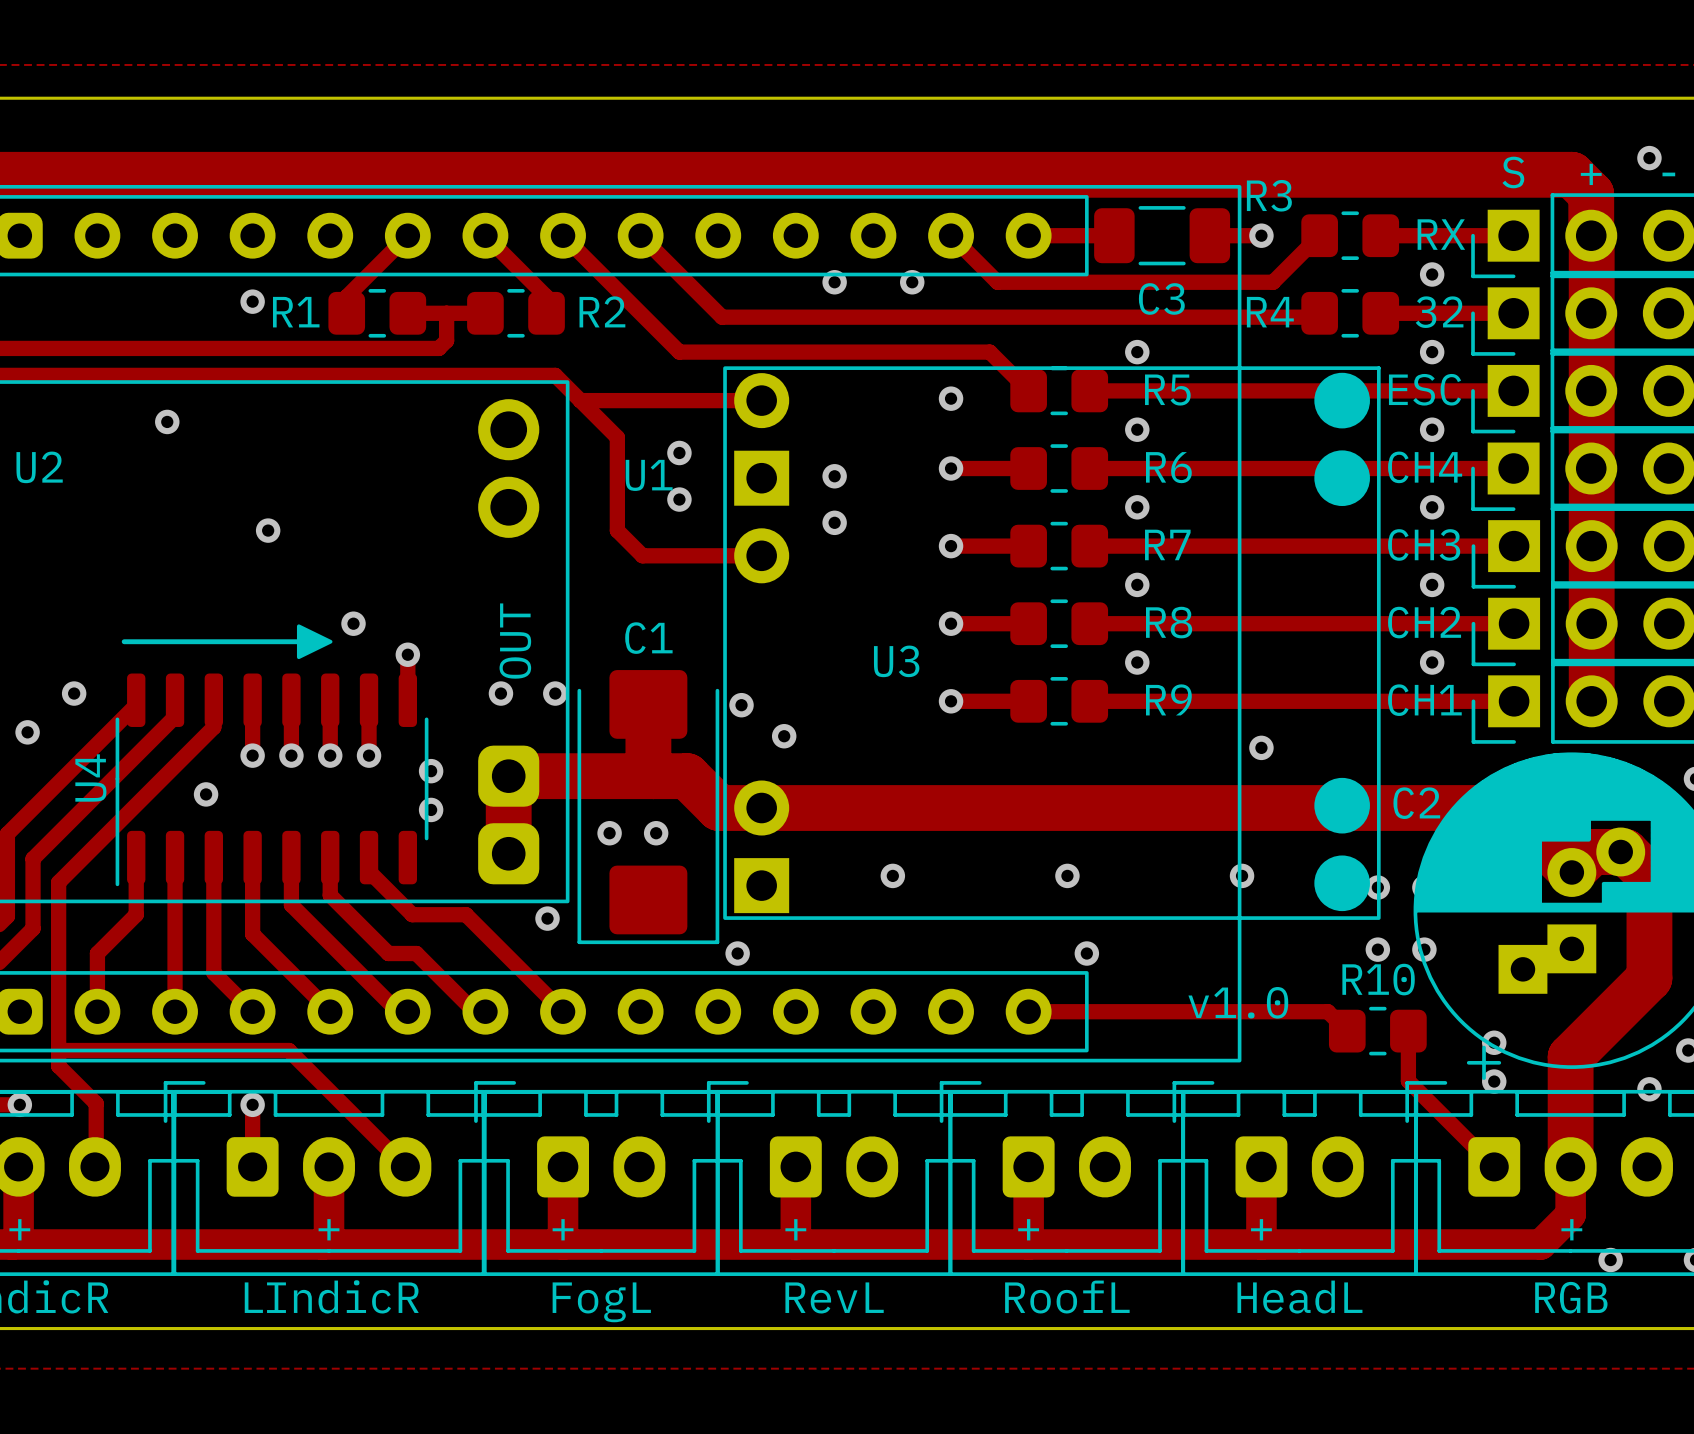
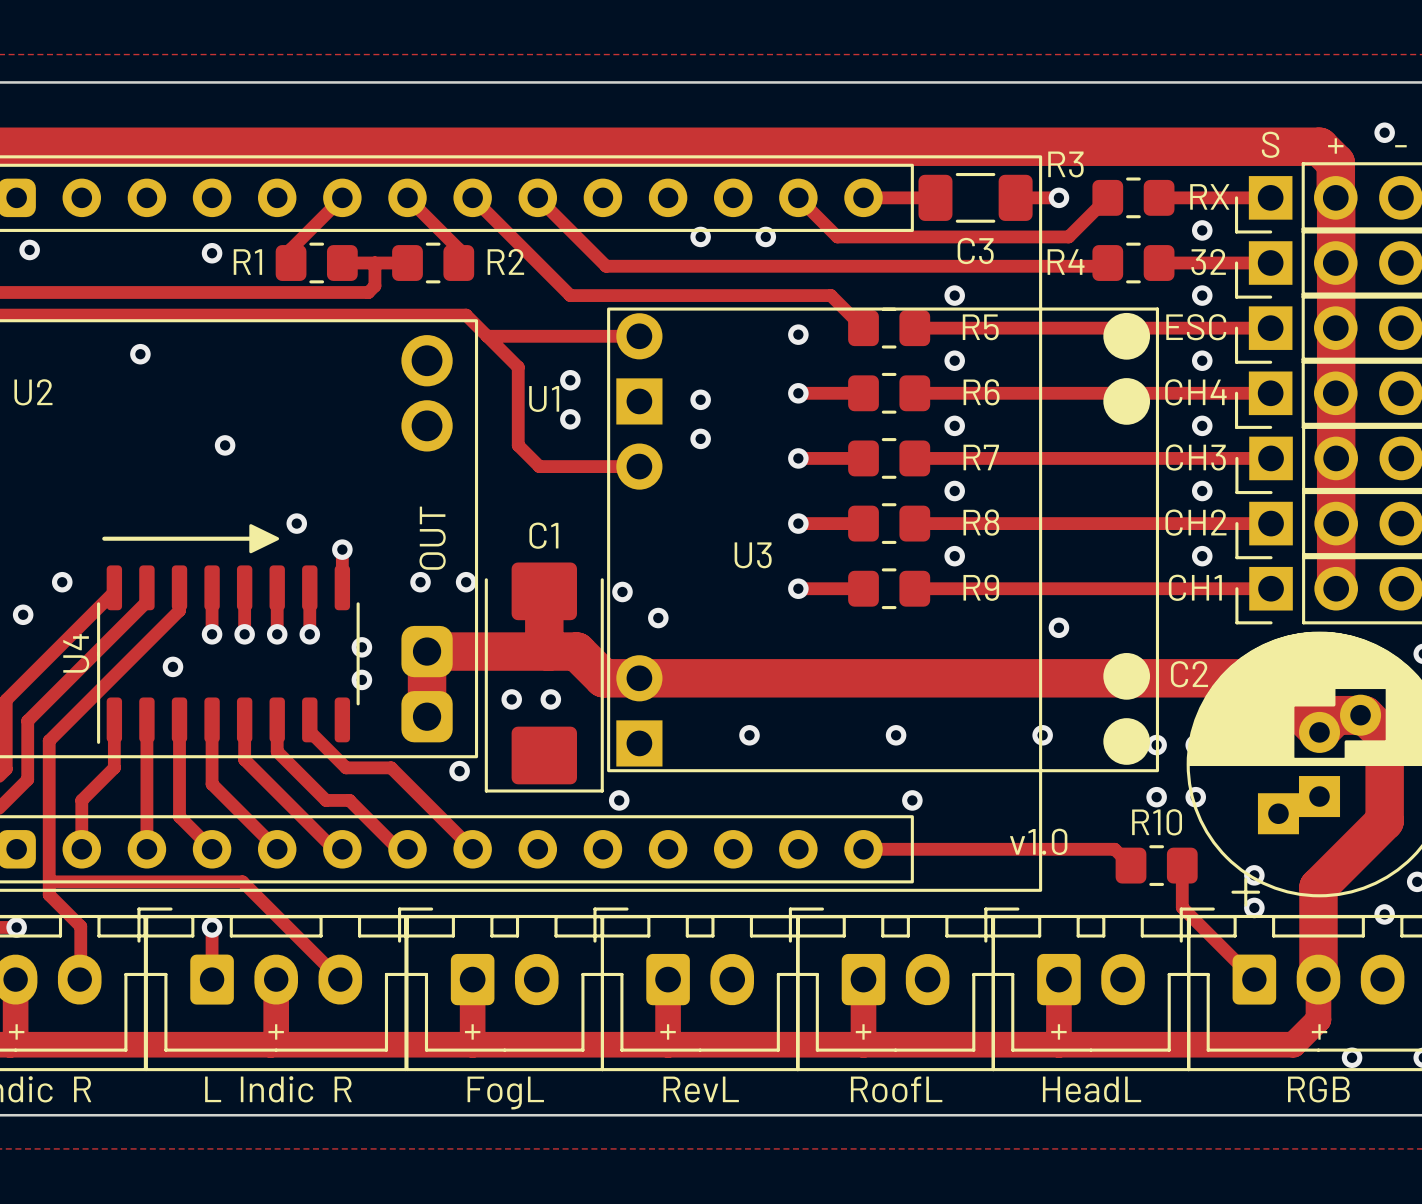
via: none -> (29, 249)

